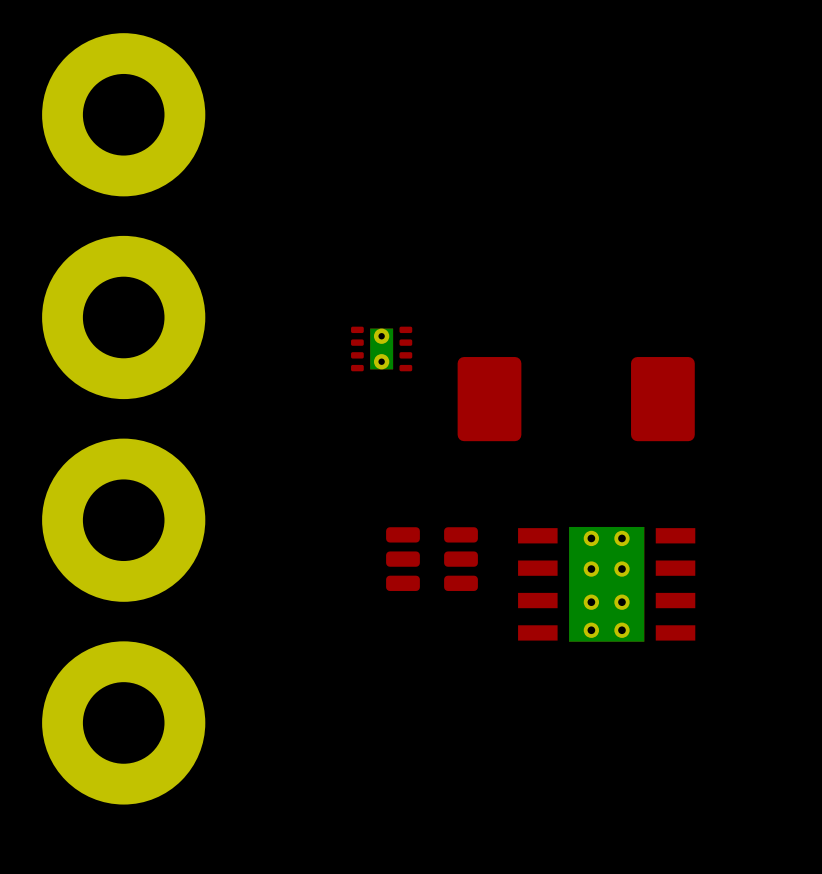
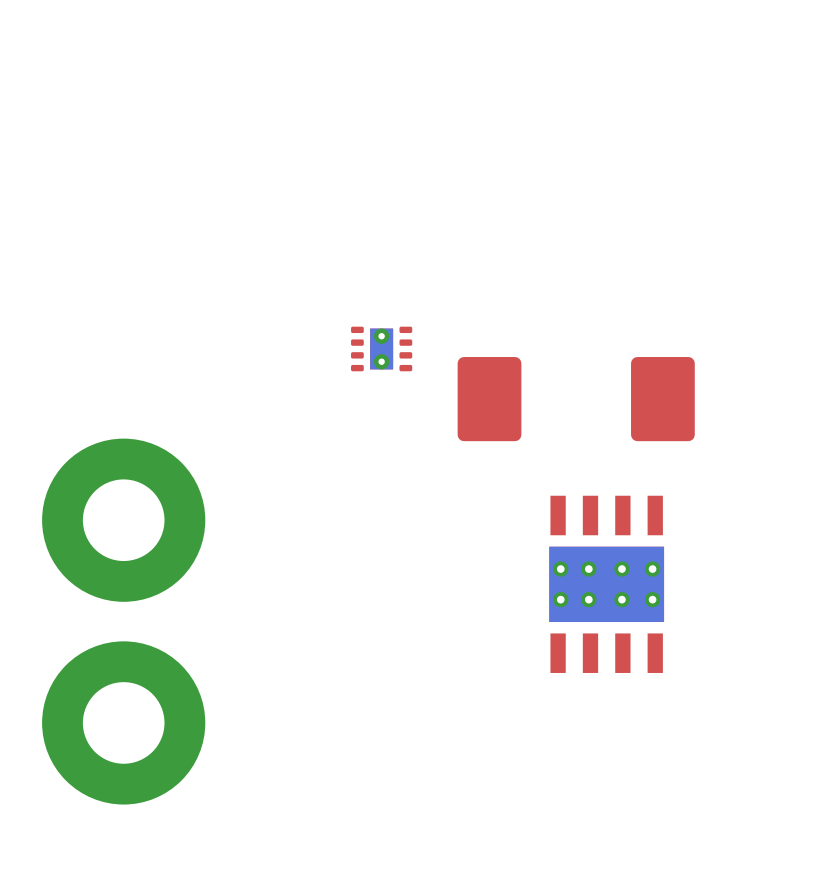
part: (123, 114) -> none
part: (123, 317) -> none
part: (431, 559) -> none
part rotation: 0° (606, 584) -> 90° clockwise (606, 584)

